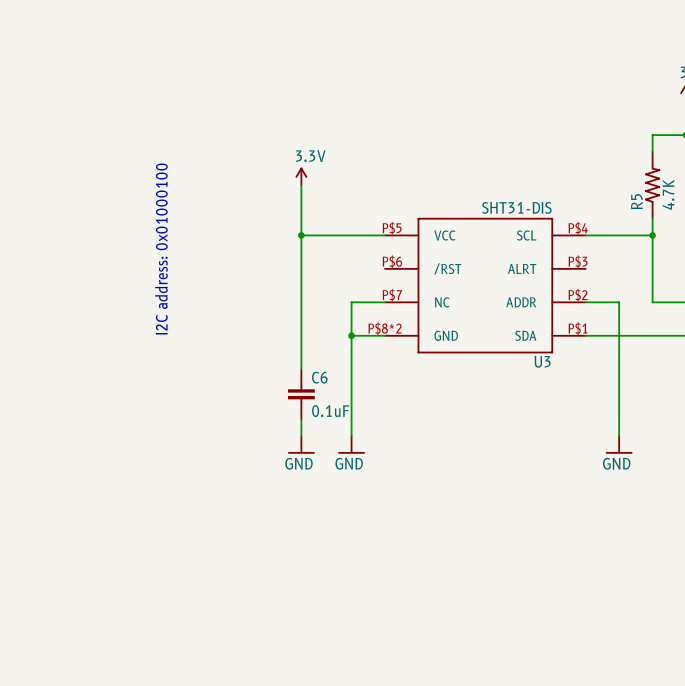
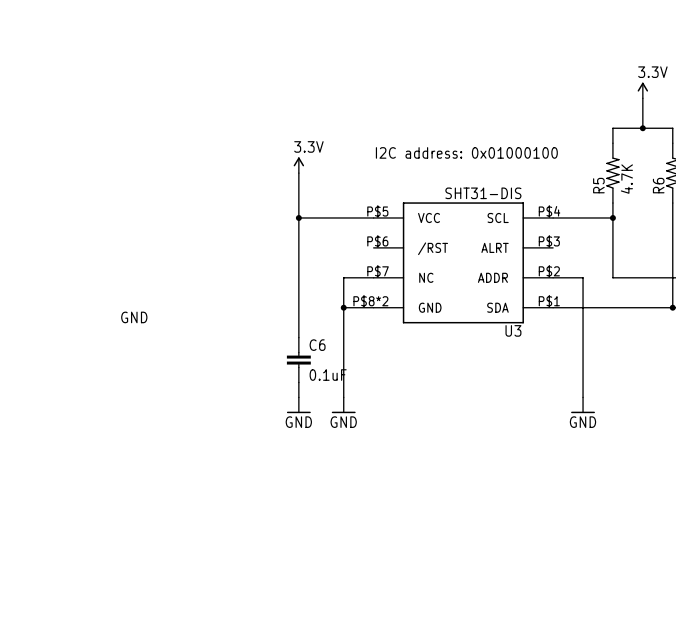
text: none -> I2C address: 0x01000100 (466, 152)
text: I2C address: 0x01000100 (161, 249) -> none
label: none -> GND (134, 317)

